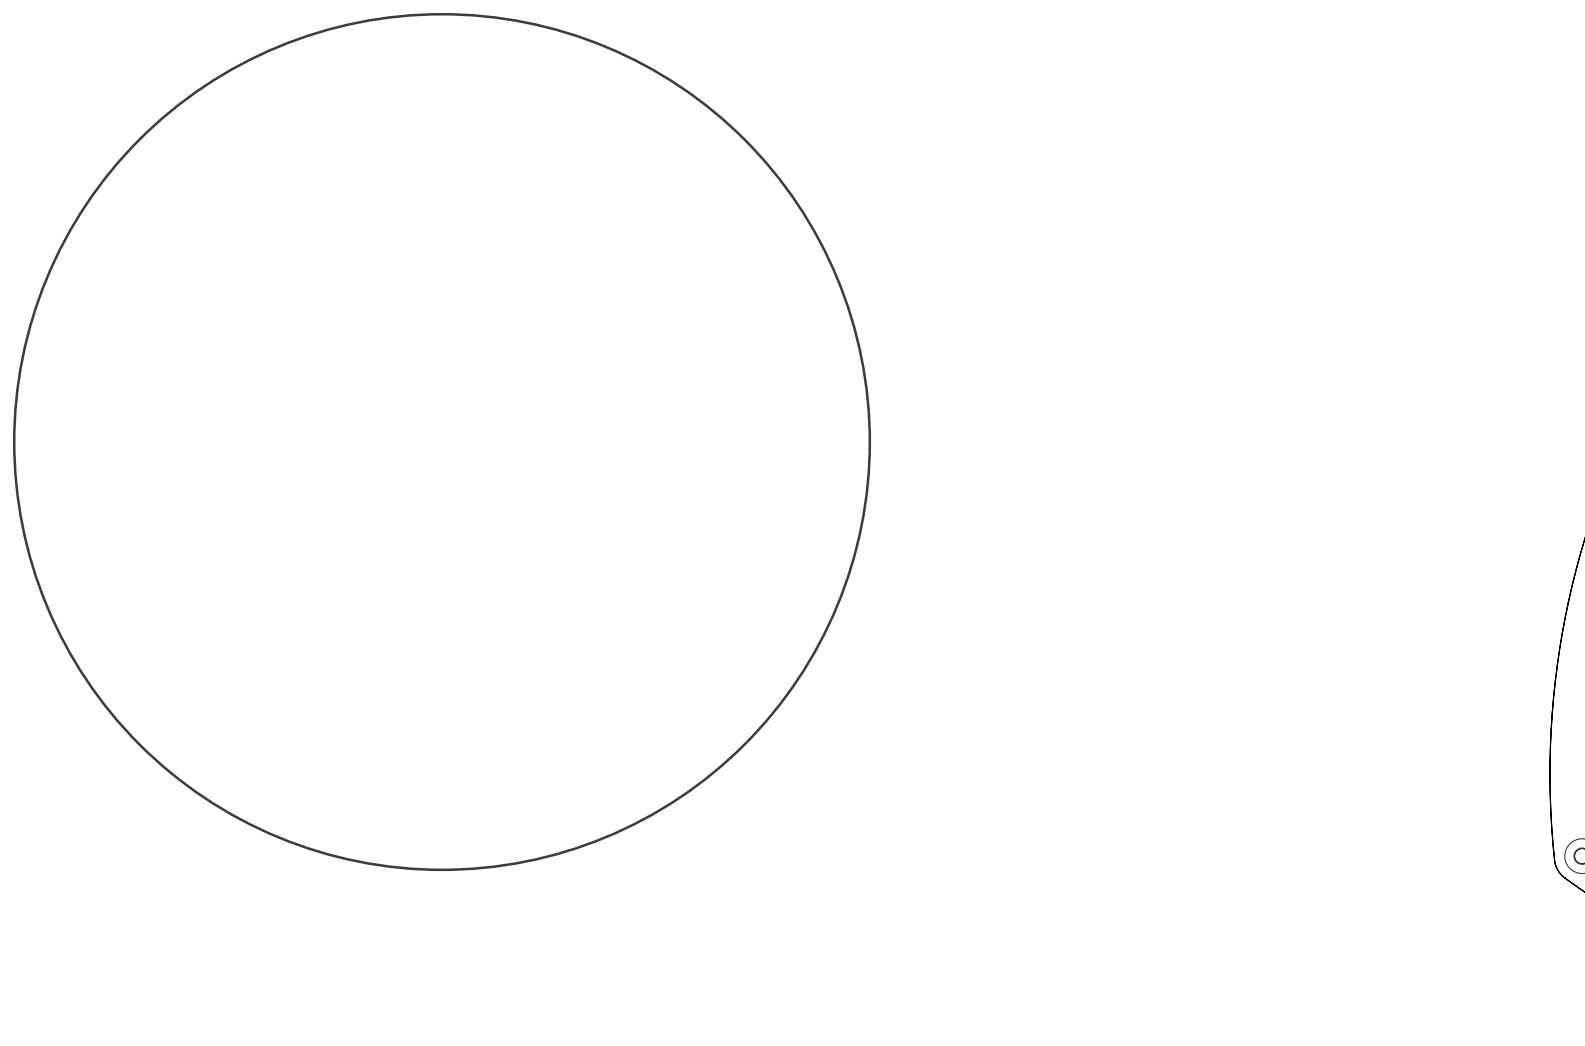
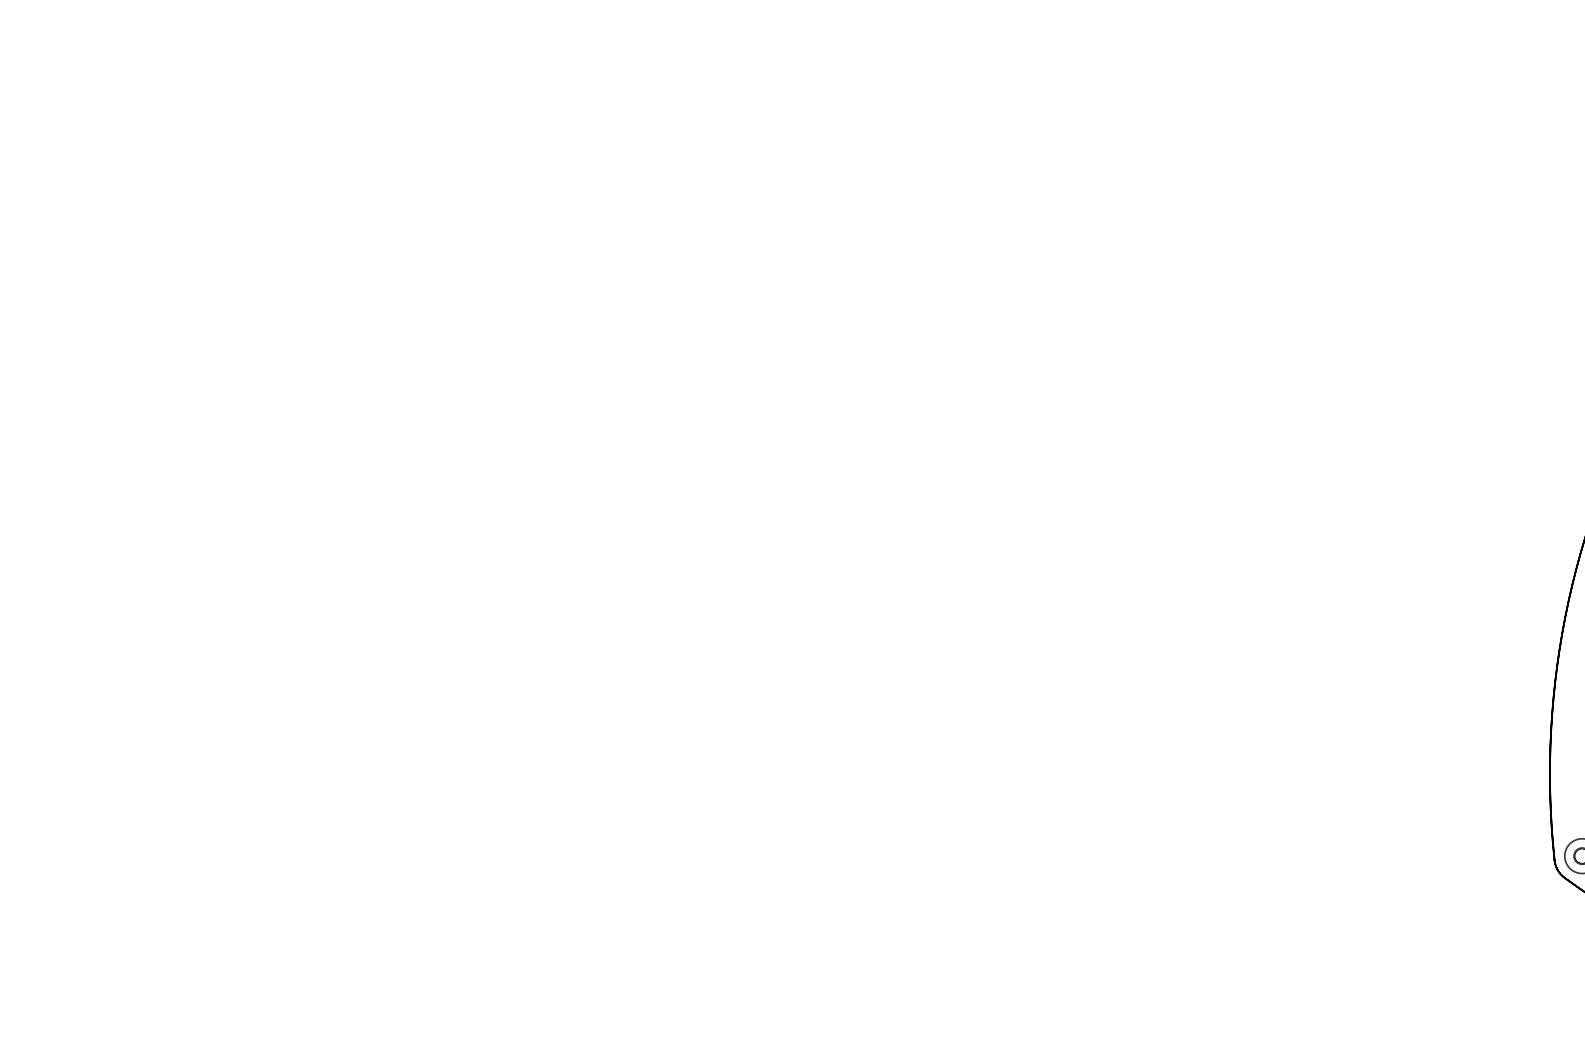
drawing: [12, 12, 872, 872] -> none

